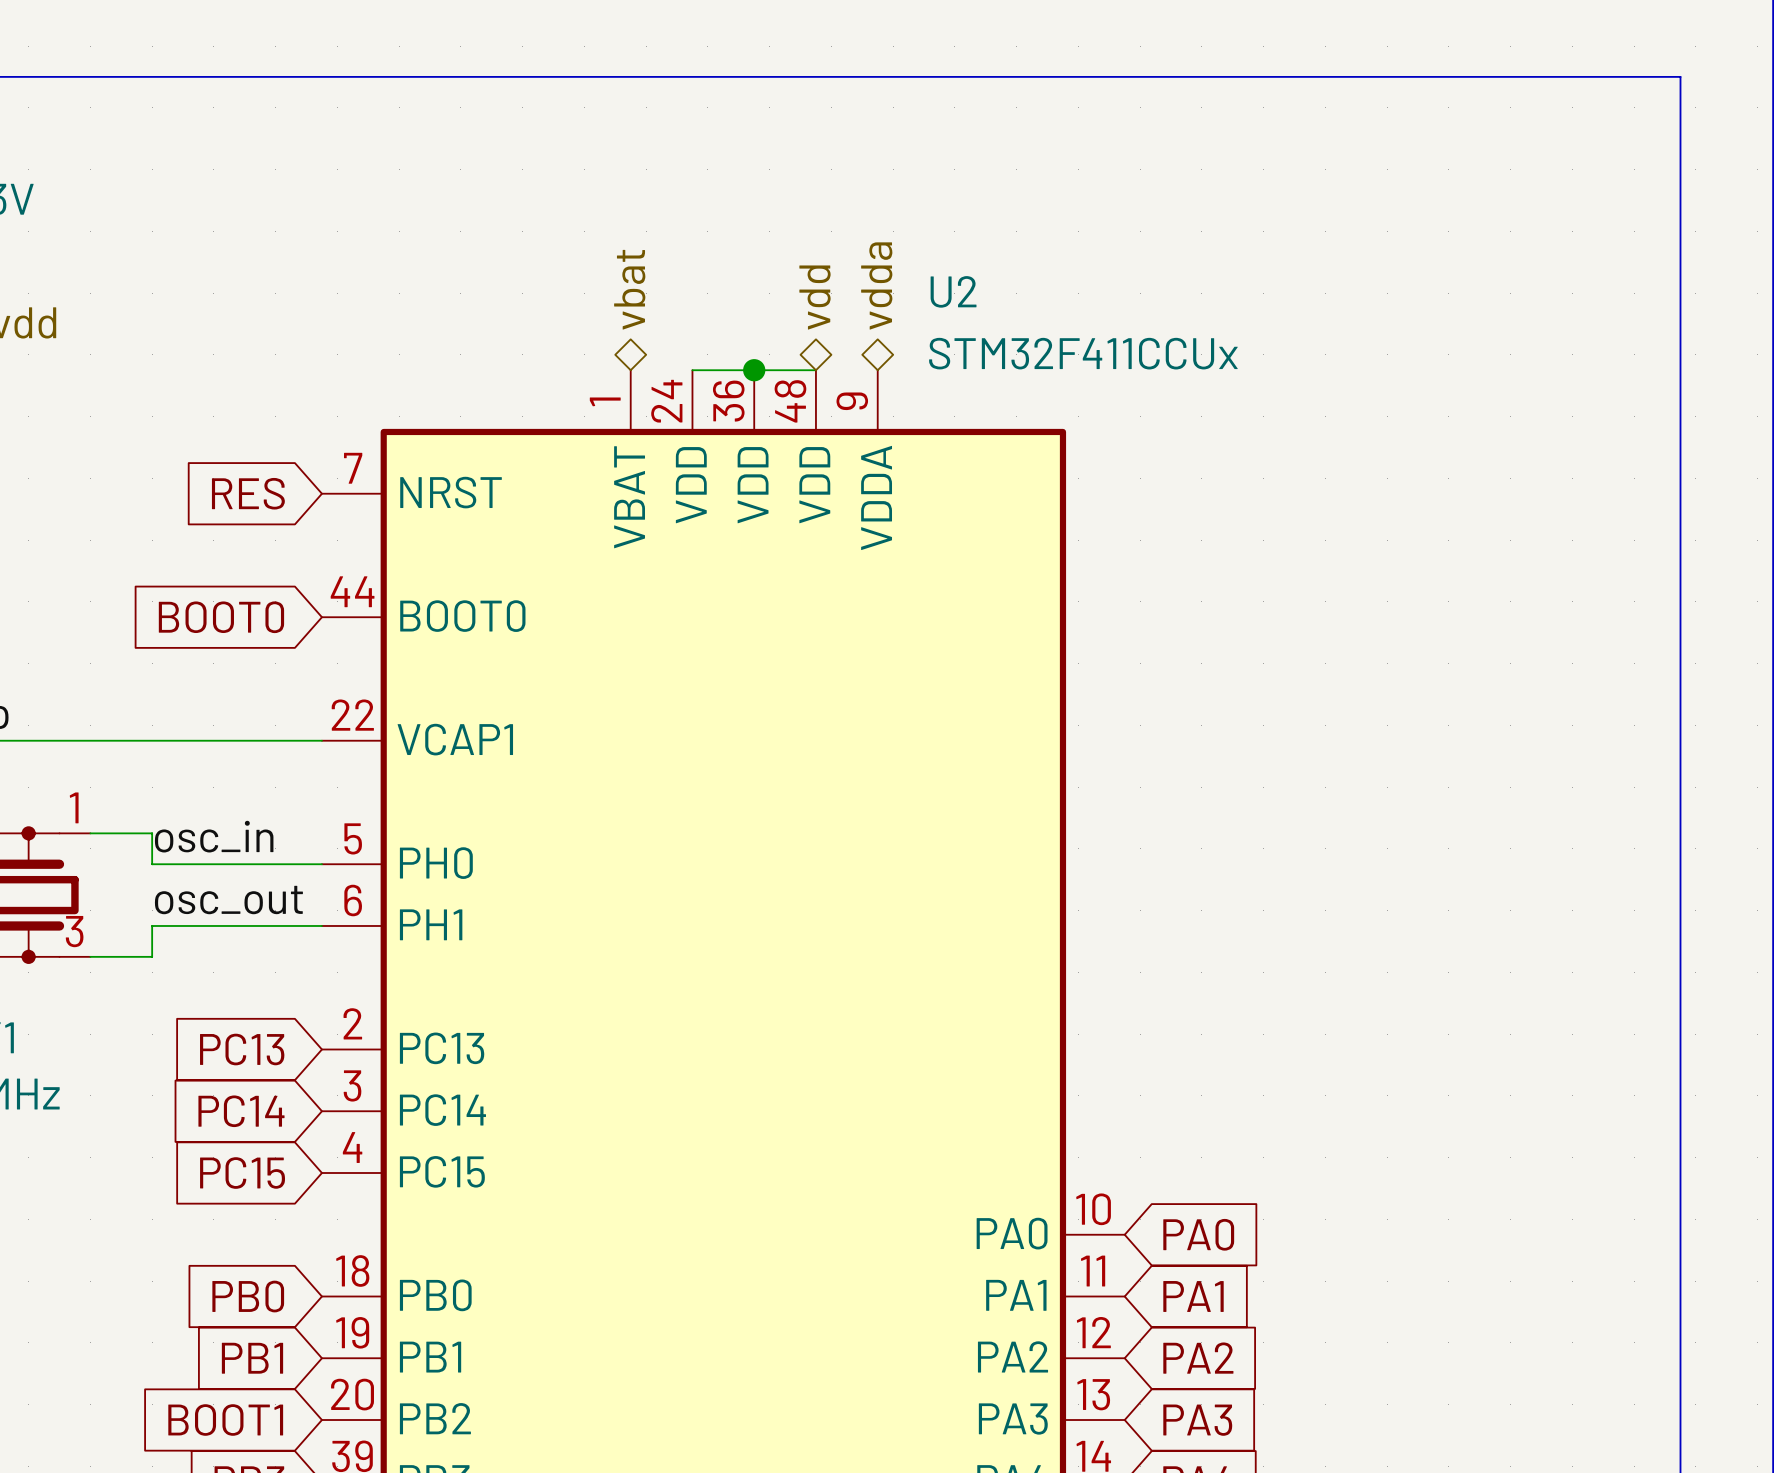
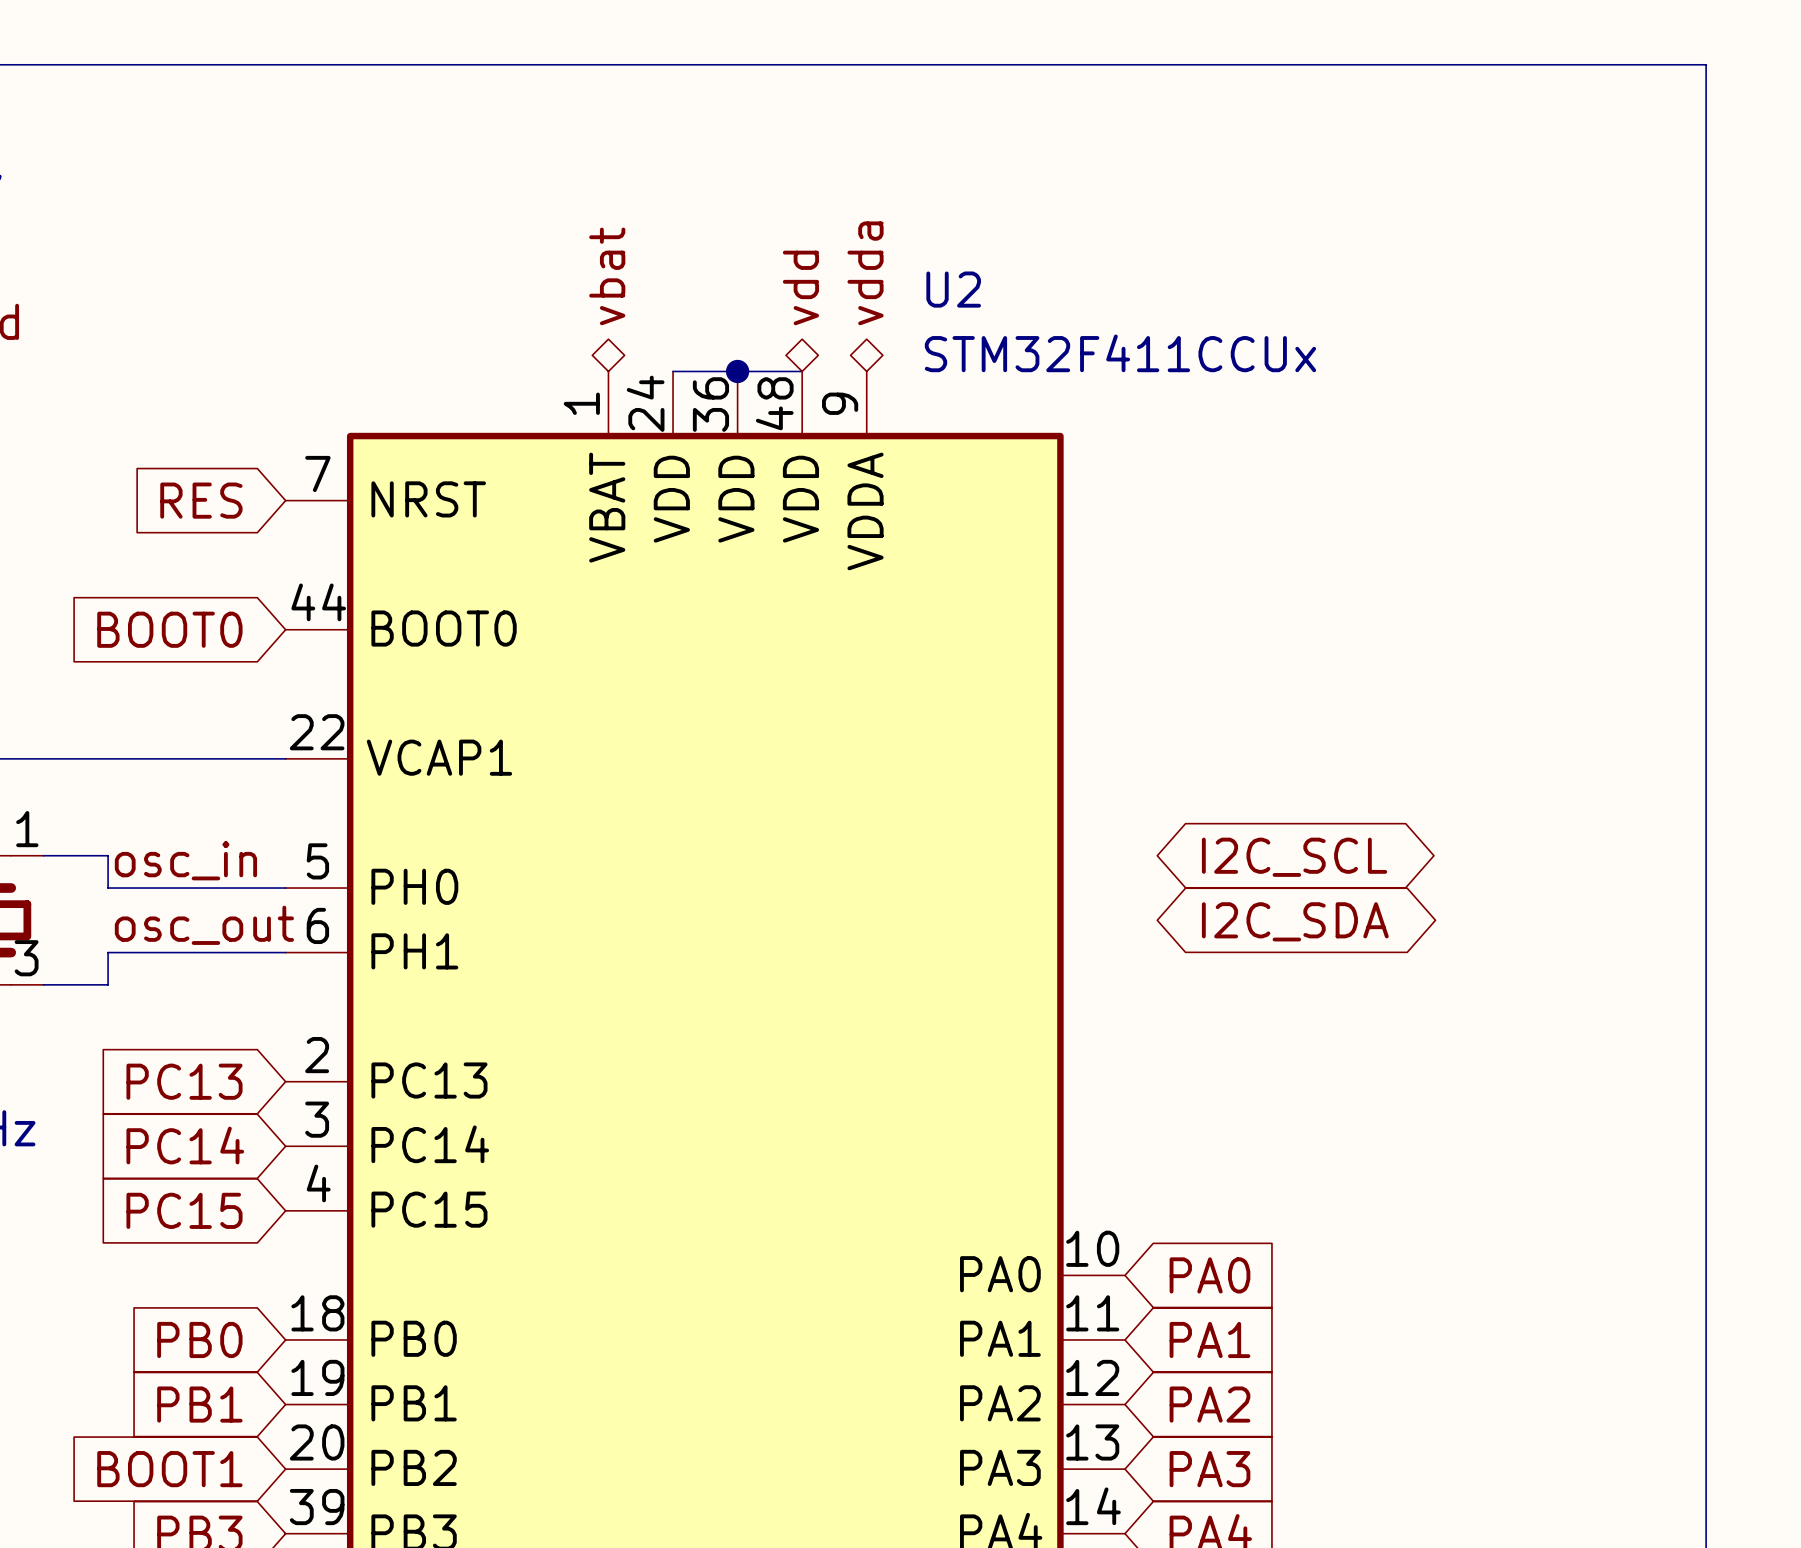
global label: none -> I2C_SCL (1294, 857)
global label: none -> I2C_SDA (1295, 921)

